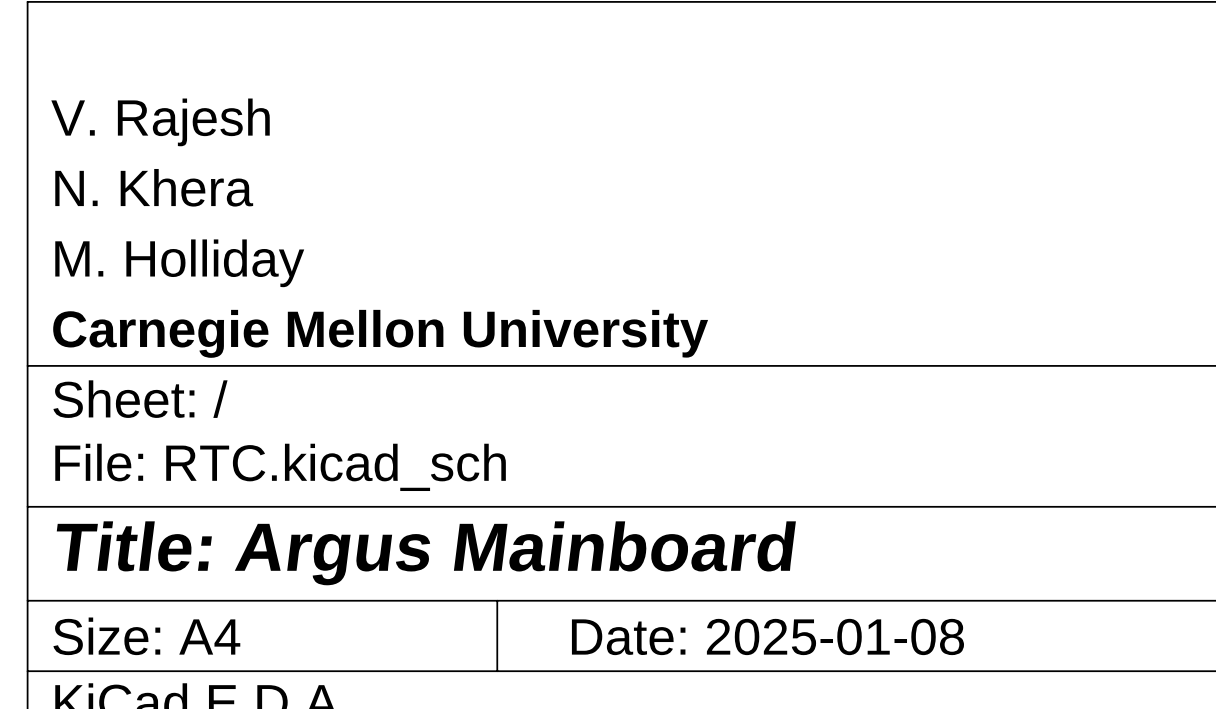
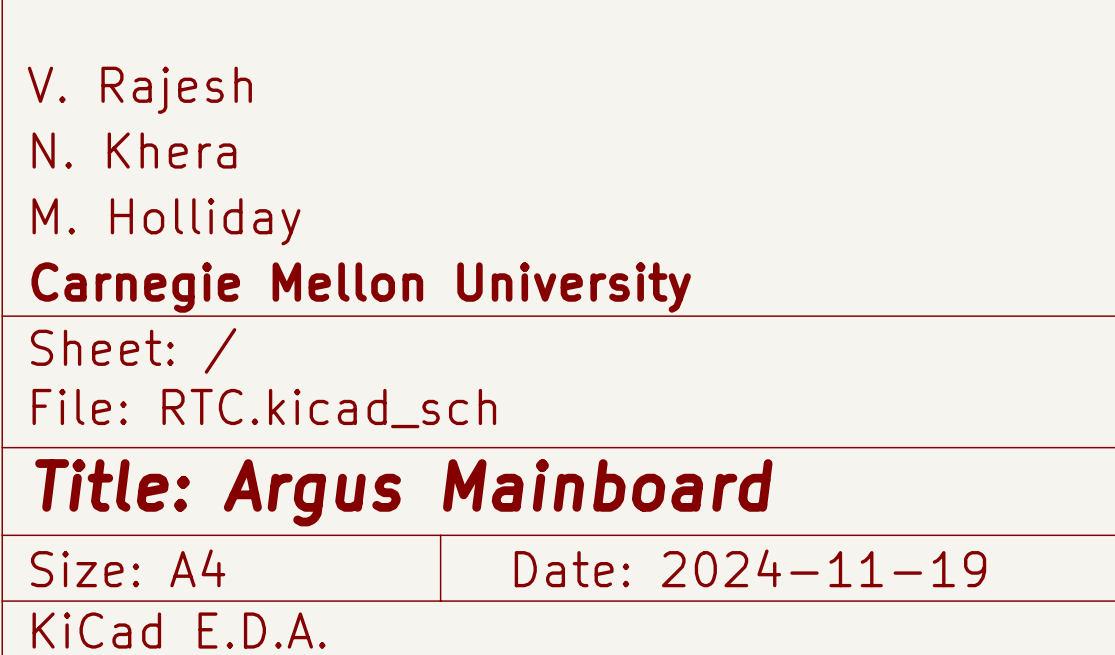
title block: Date: 2025-01-08 (767, 636) -> Date: 2024-11-19 (750, 568)

